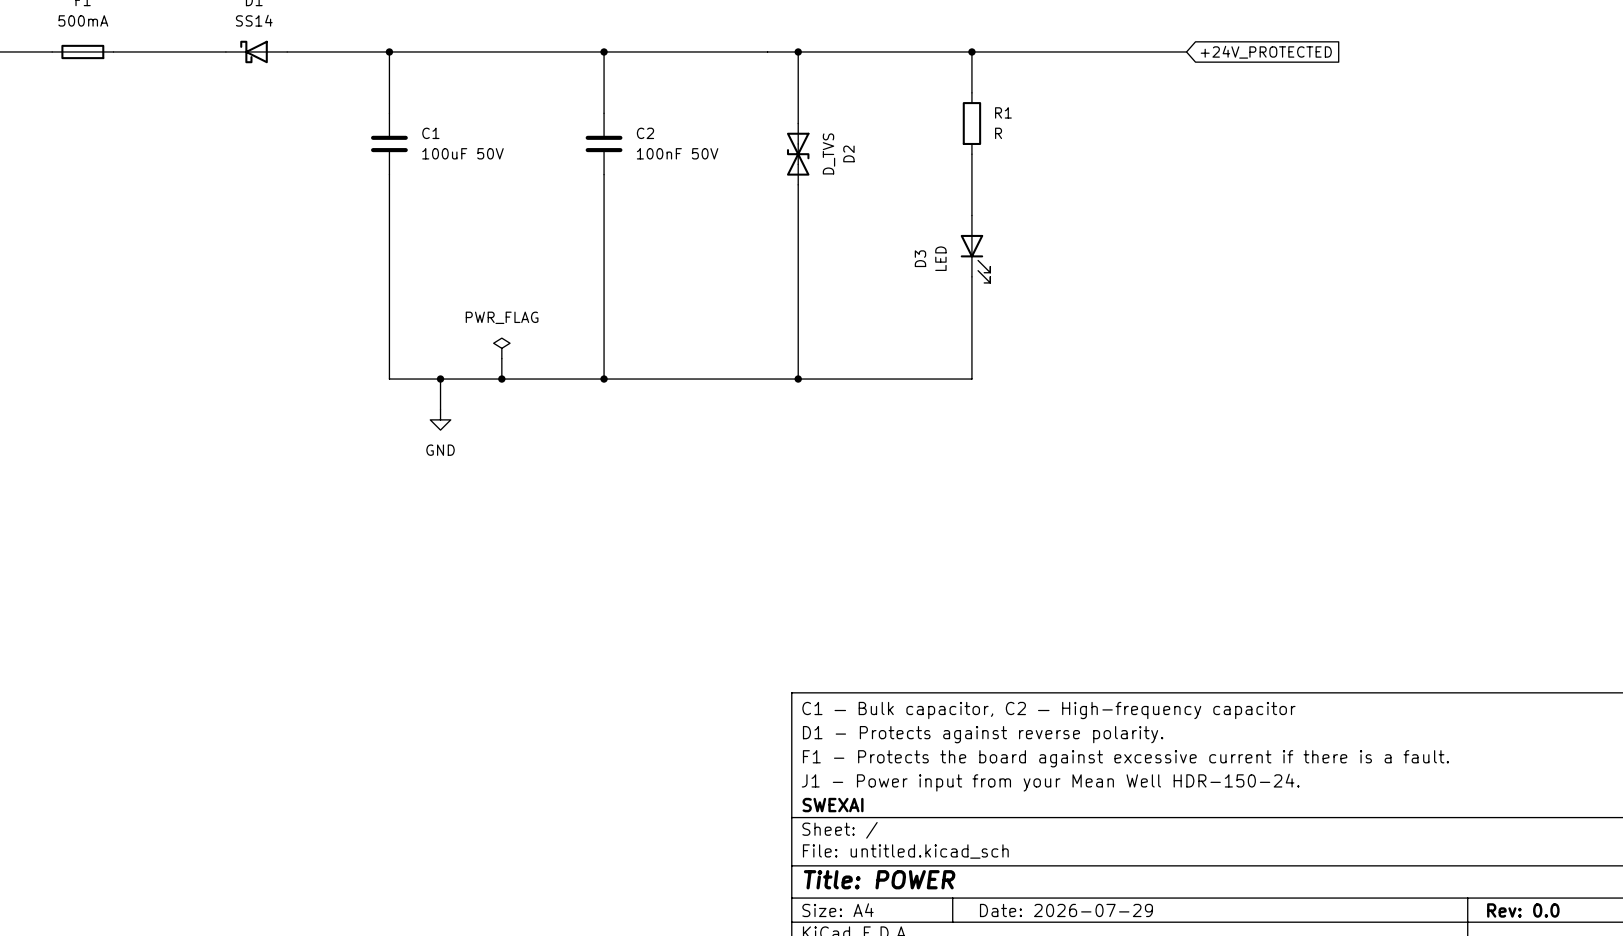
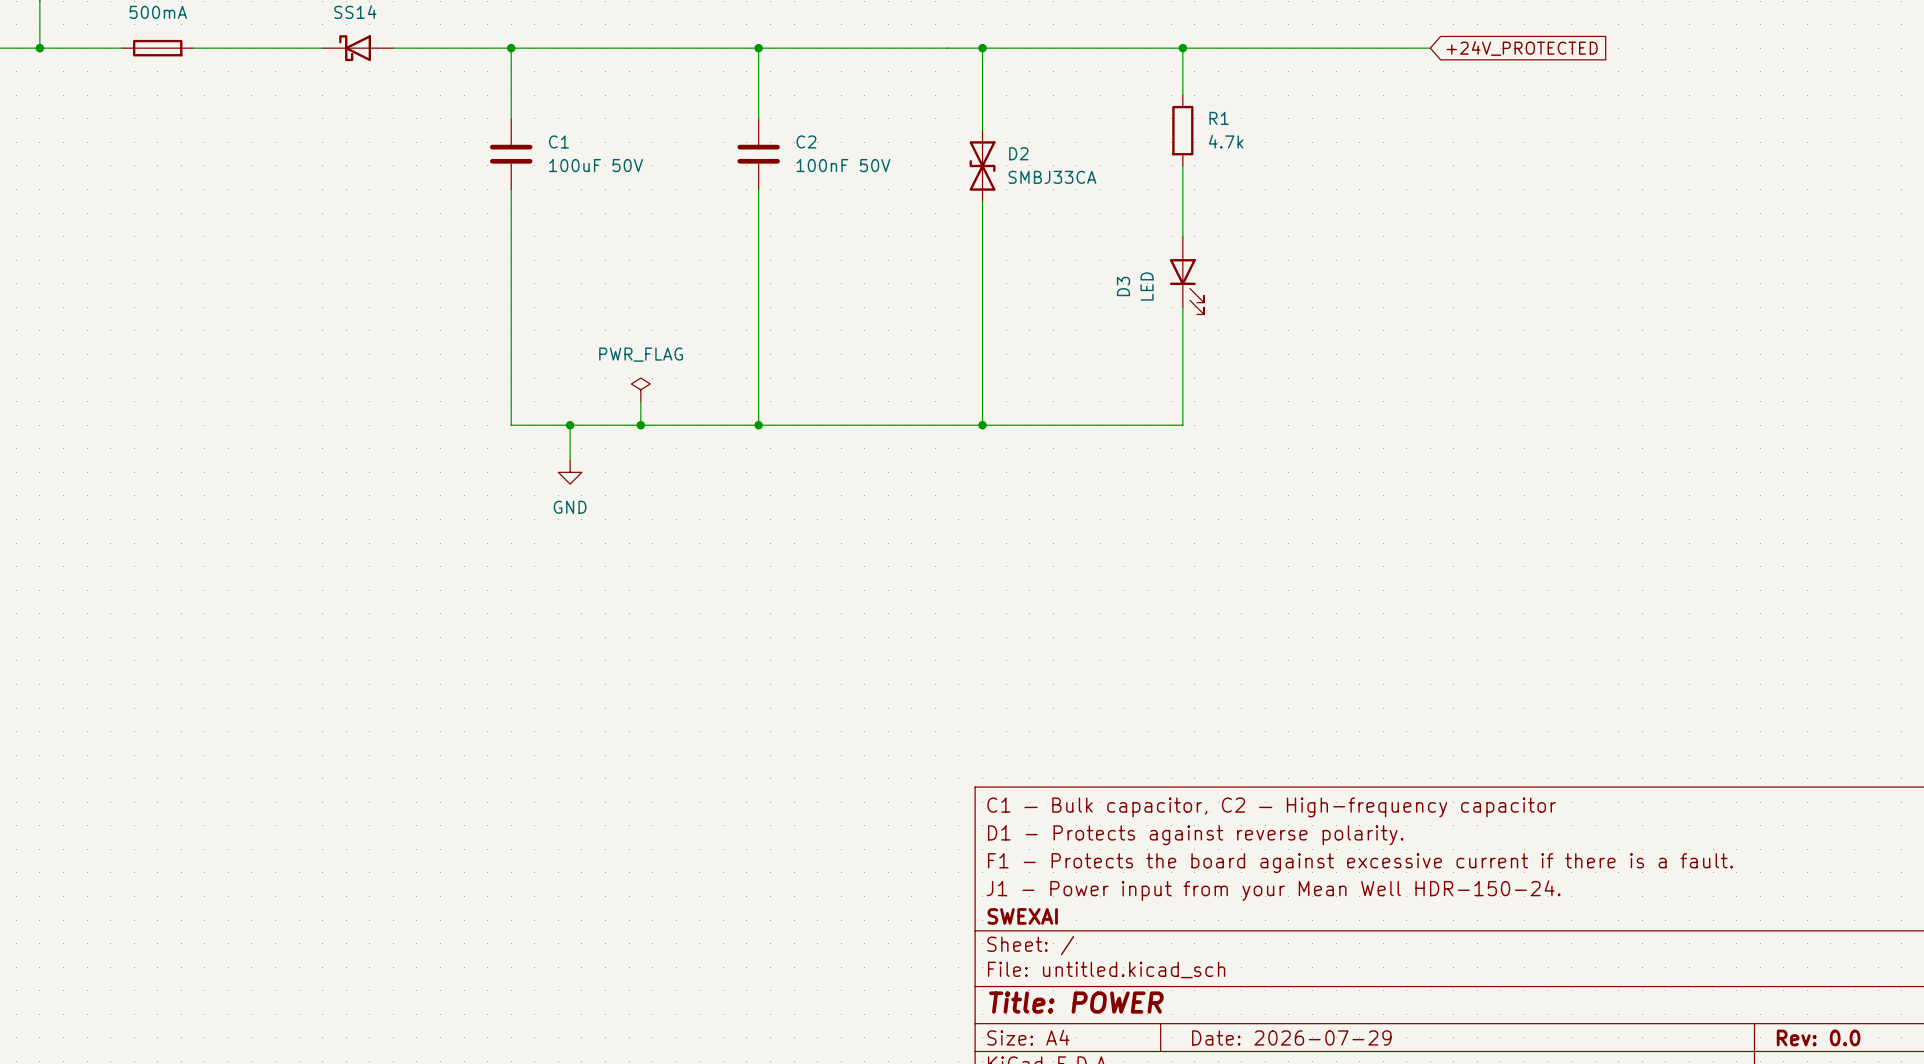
R1 value: R (998, 133) -> 4.7k (1226, 141)
D2 value: D_TVS (828, 153) -> SMBJ33CA (1052, 177)
D2 name rotation: 0° (848, 153) -> 90° clockwise (1018, 153)

